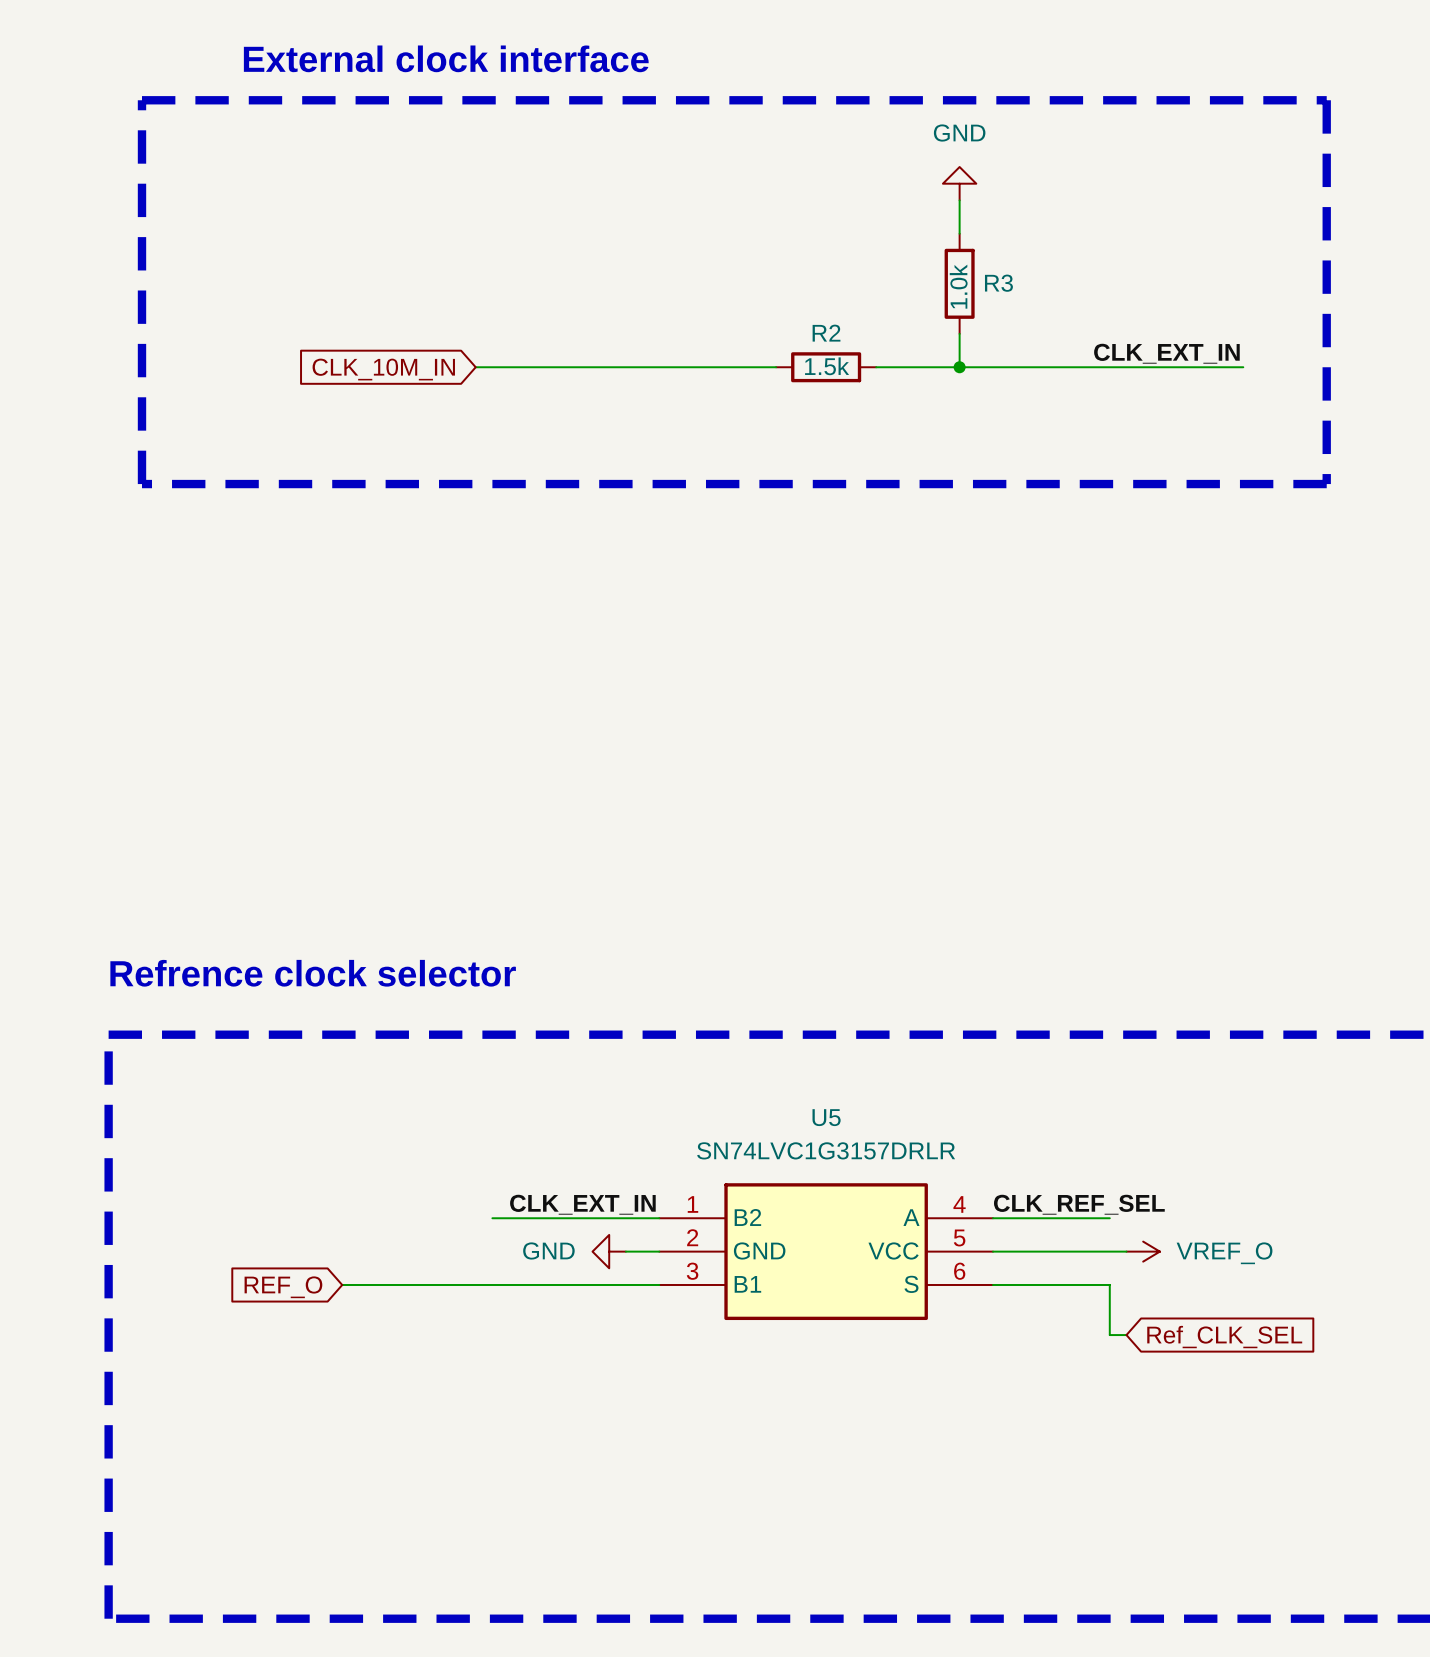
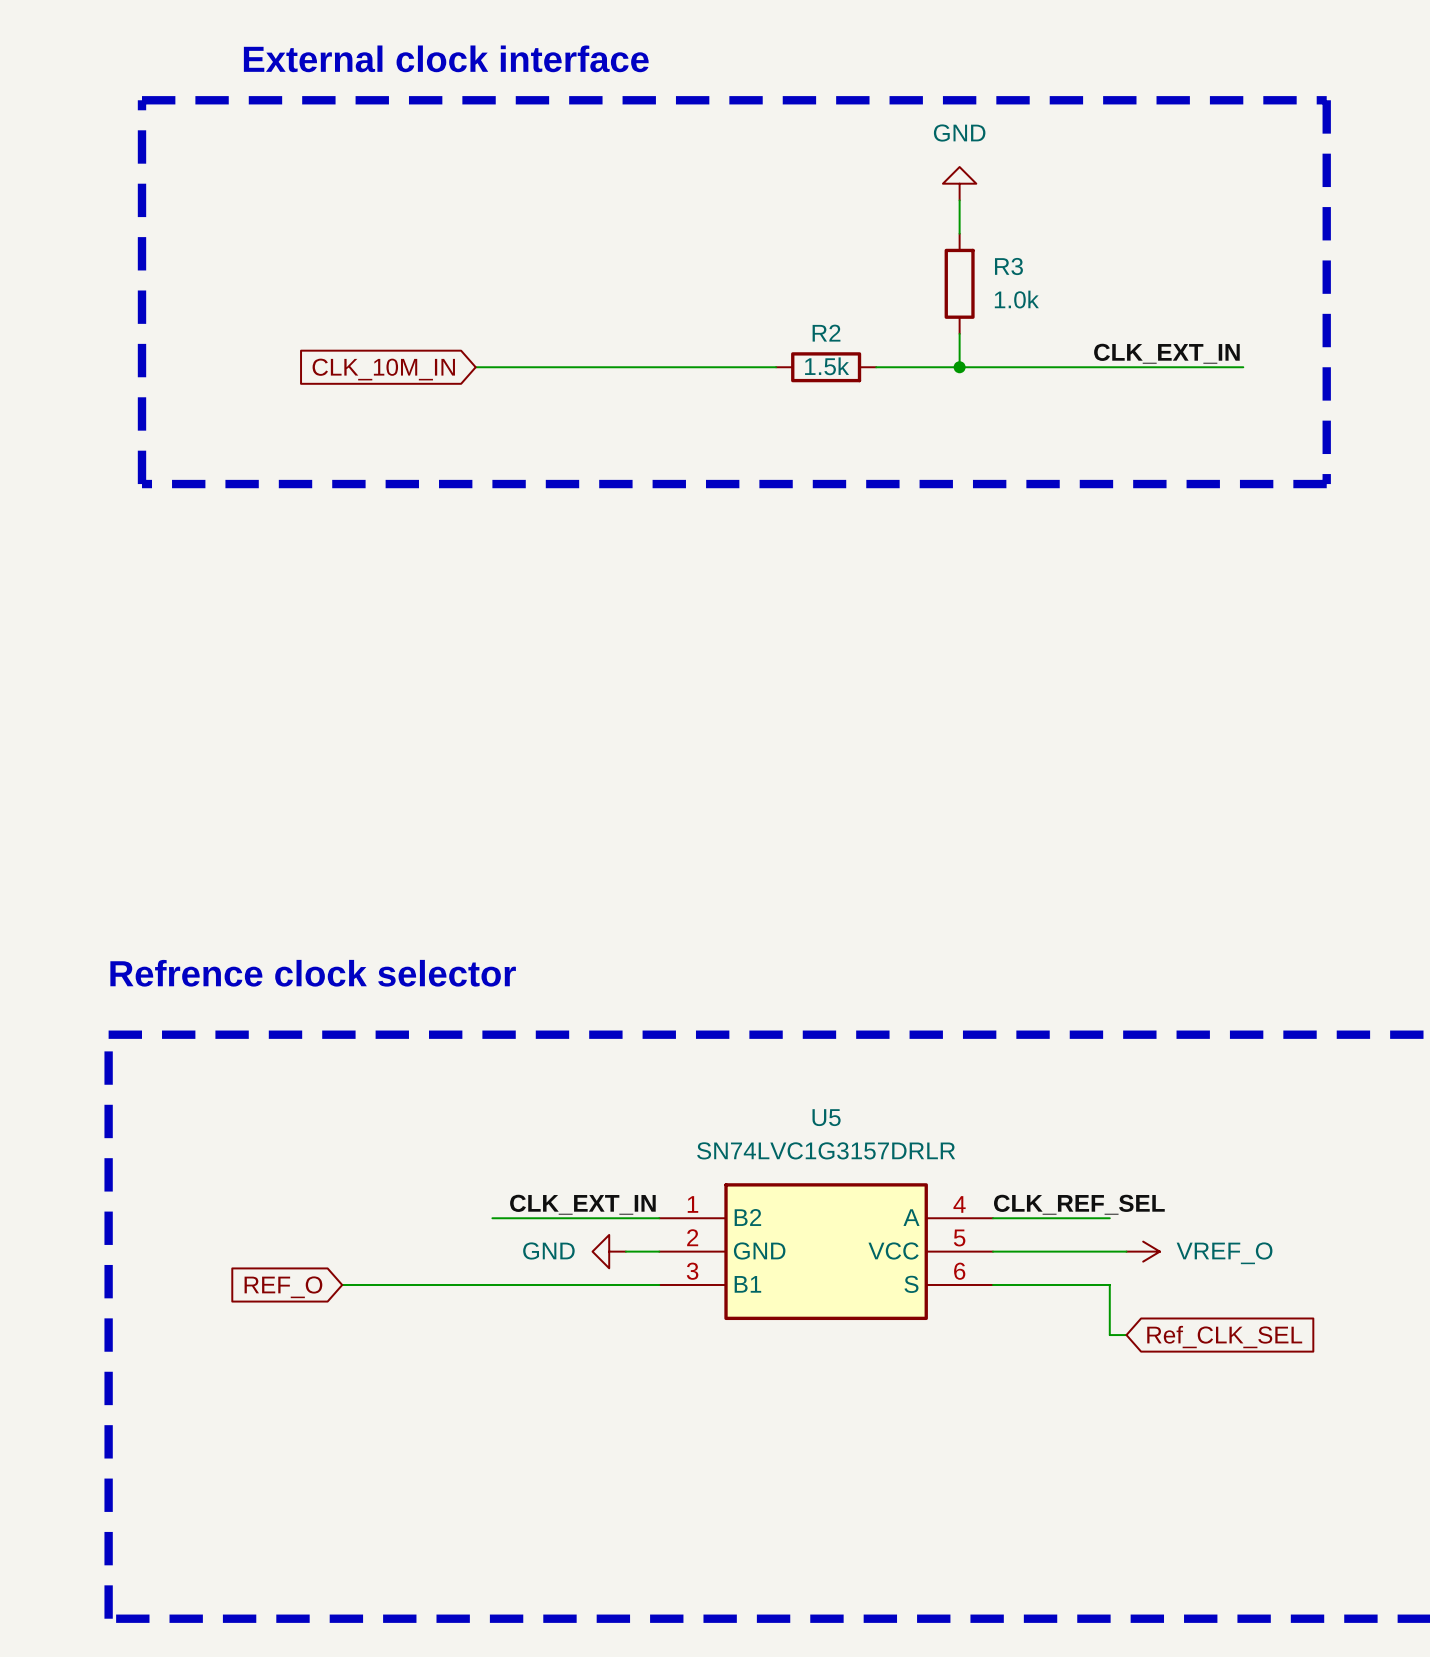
R3 name position: R3 (998, 283) -> R3 (1008, 266)
R3 value rotation: 0° (958, 286) -> 90° clockwise (1016, 299)
R3 value position: 1.0k (958, 286) -> 1.0k (1016, 299)

